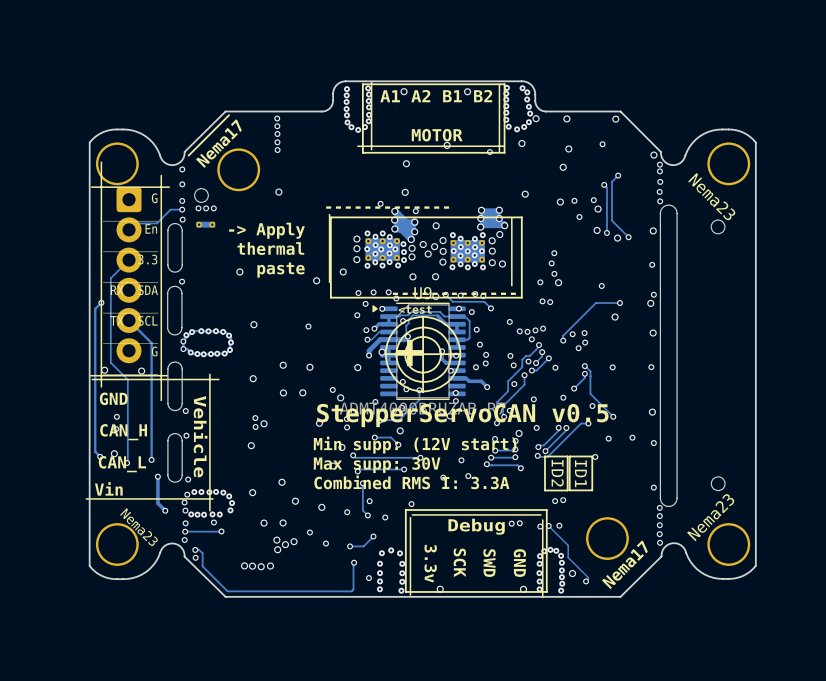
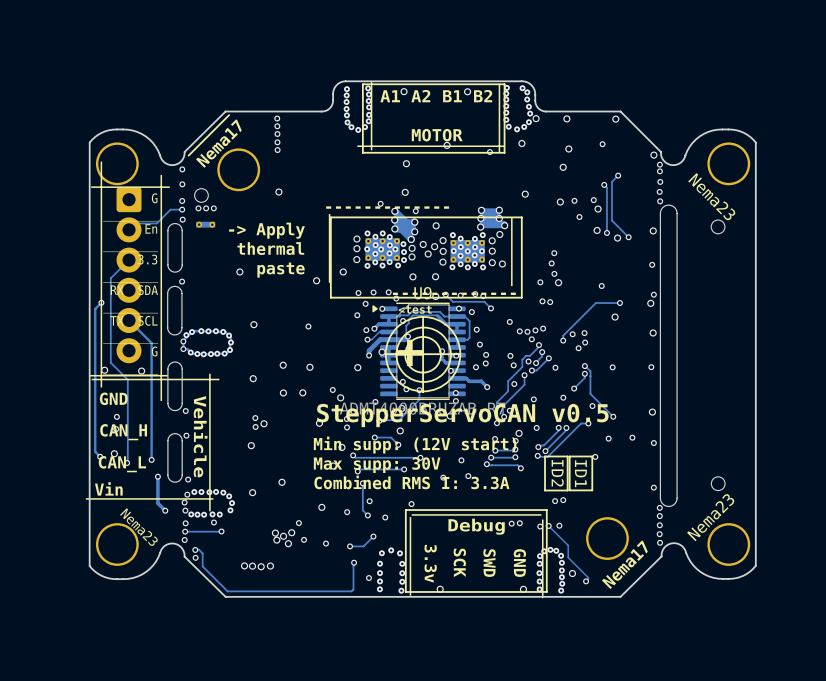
via: (295, 501) -> none
via: (283, 522) -> none
via: (264, 523) -> none
via: none -> (298, 523)
via: none -> (291, 532)
via: (309, 532) -> none
via: none -> (275, 533)
via: none -> (283, 536)
via: none -> (304, 539)
via: (294, 541) -> none
via: none -> (288, 543)
via: (285, 544) -> none
via: (277, 549) -> none

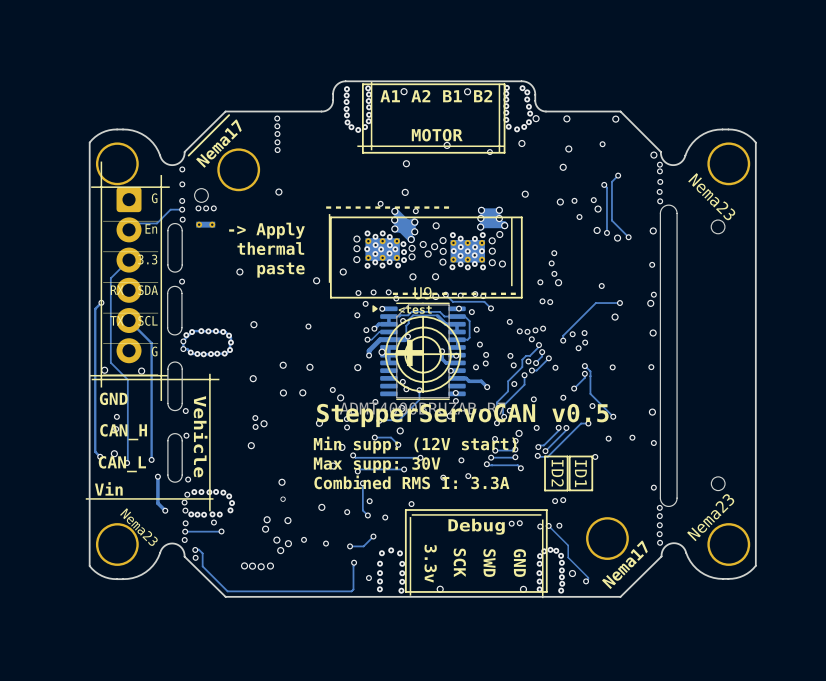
via: (252, 492) -> none
via: none -> (283, 499)
via: none -> (267, 519)
via: none -> (287, 520)
via: (298, 523) -> none
via: none -> (265, 529)
via: (291, 532) -> none
via: (275, 533) -> none
via: (283, 536) -> none
via: none -> (280, 550)

